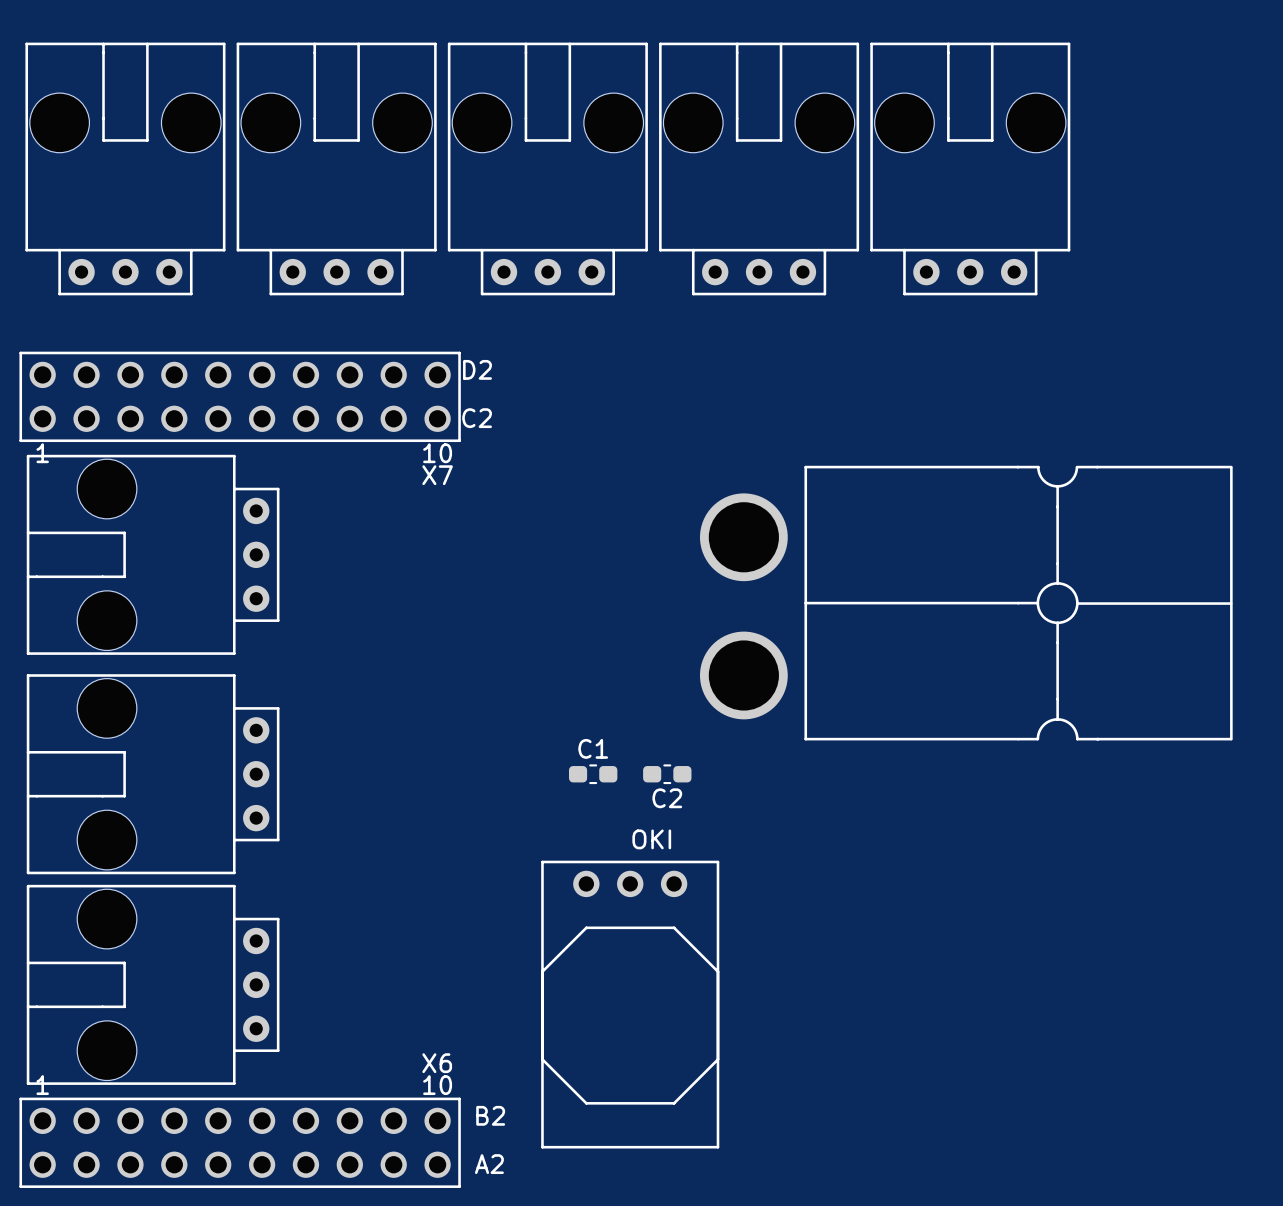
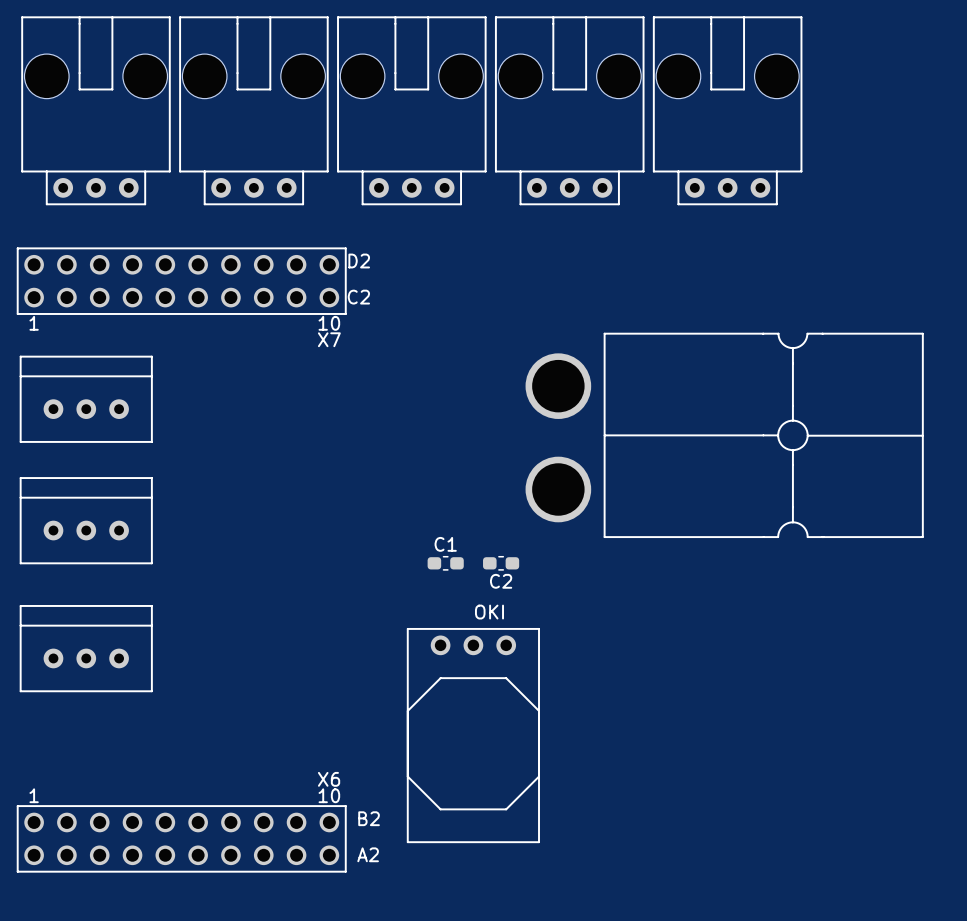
part: none -> (86, 399)
part: (153, 554) -> none
part: none -> (86, 520)
part: (153, 774) -> none
part: none -> (86, 648)
part: (153, 984) -> none

